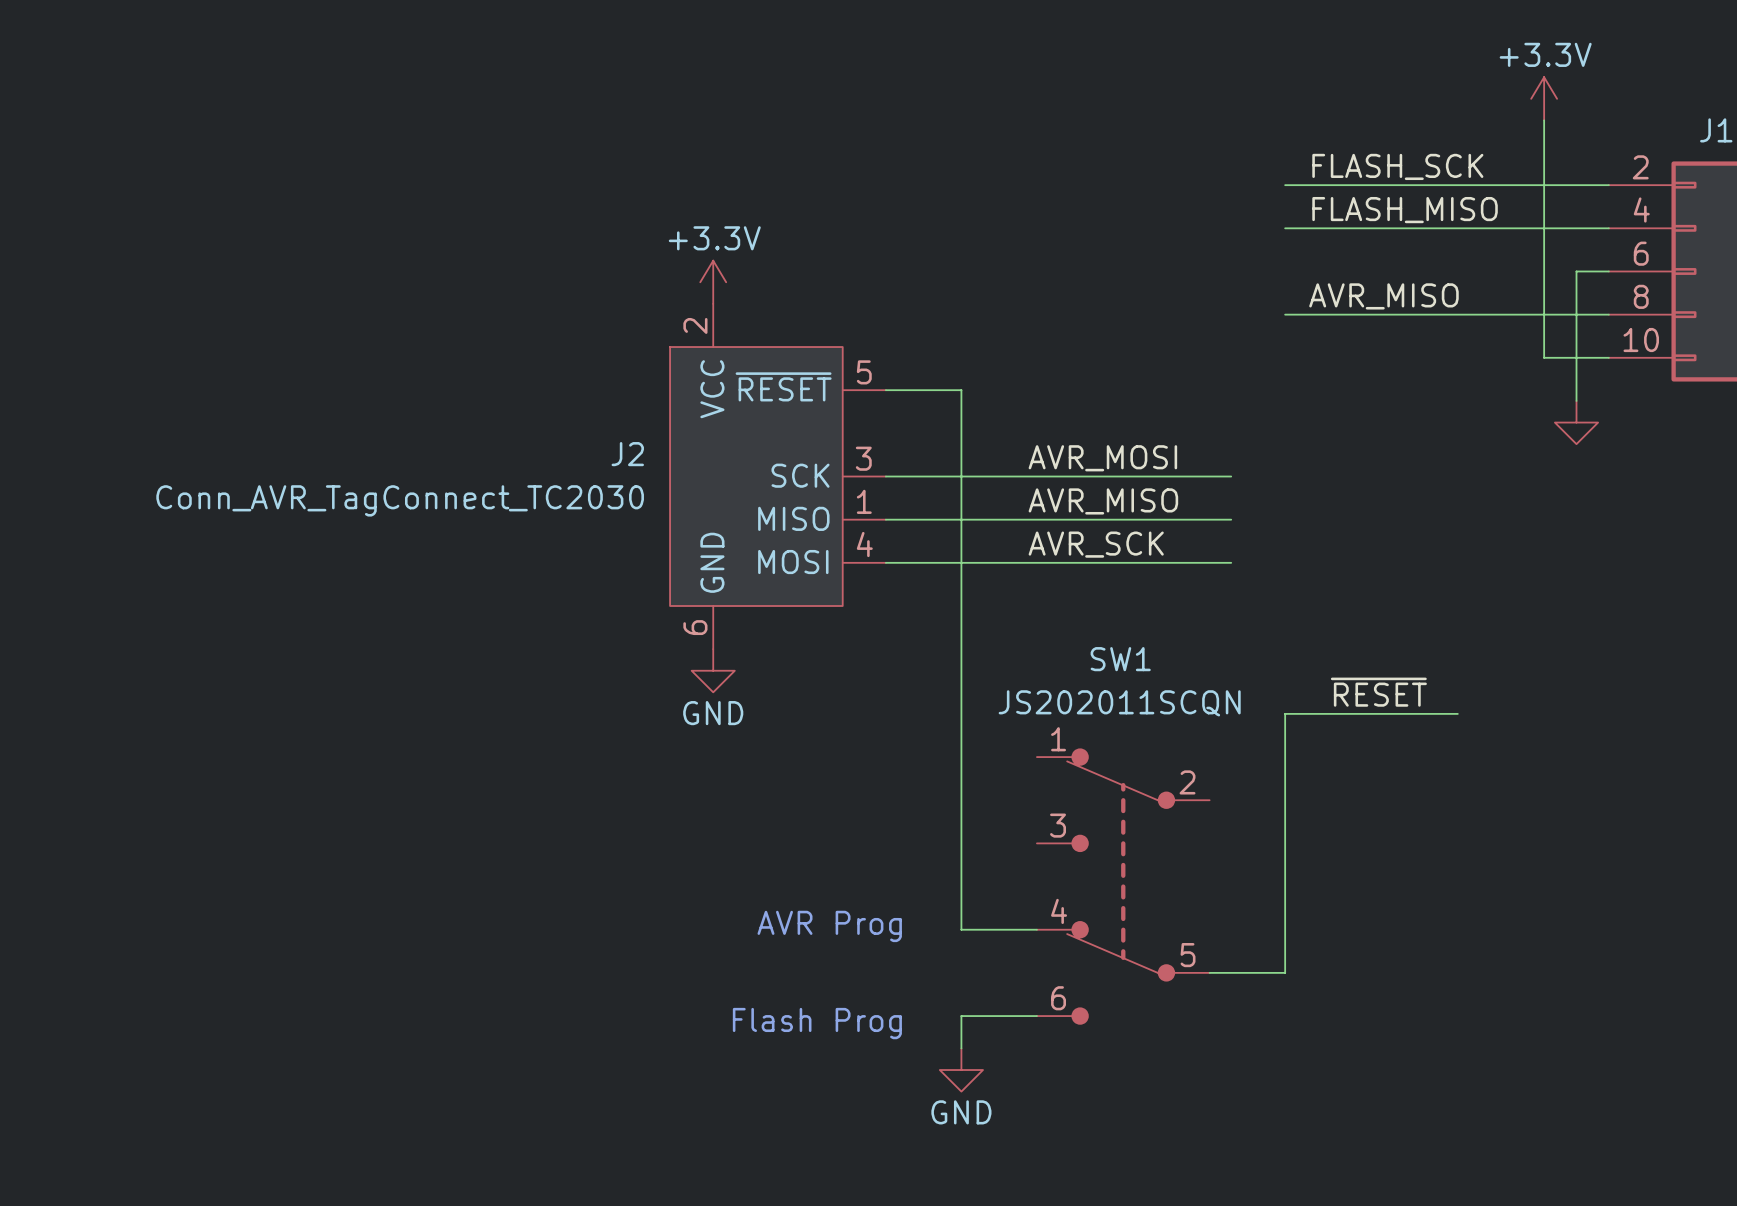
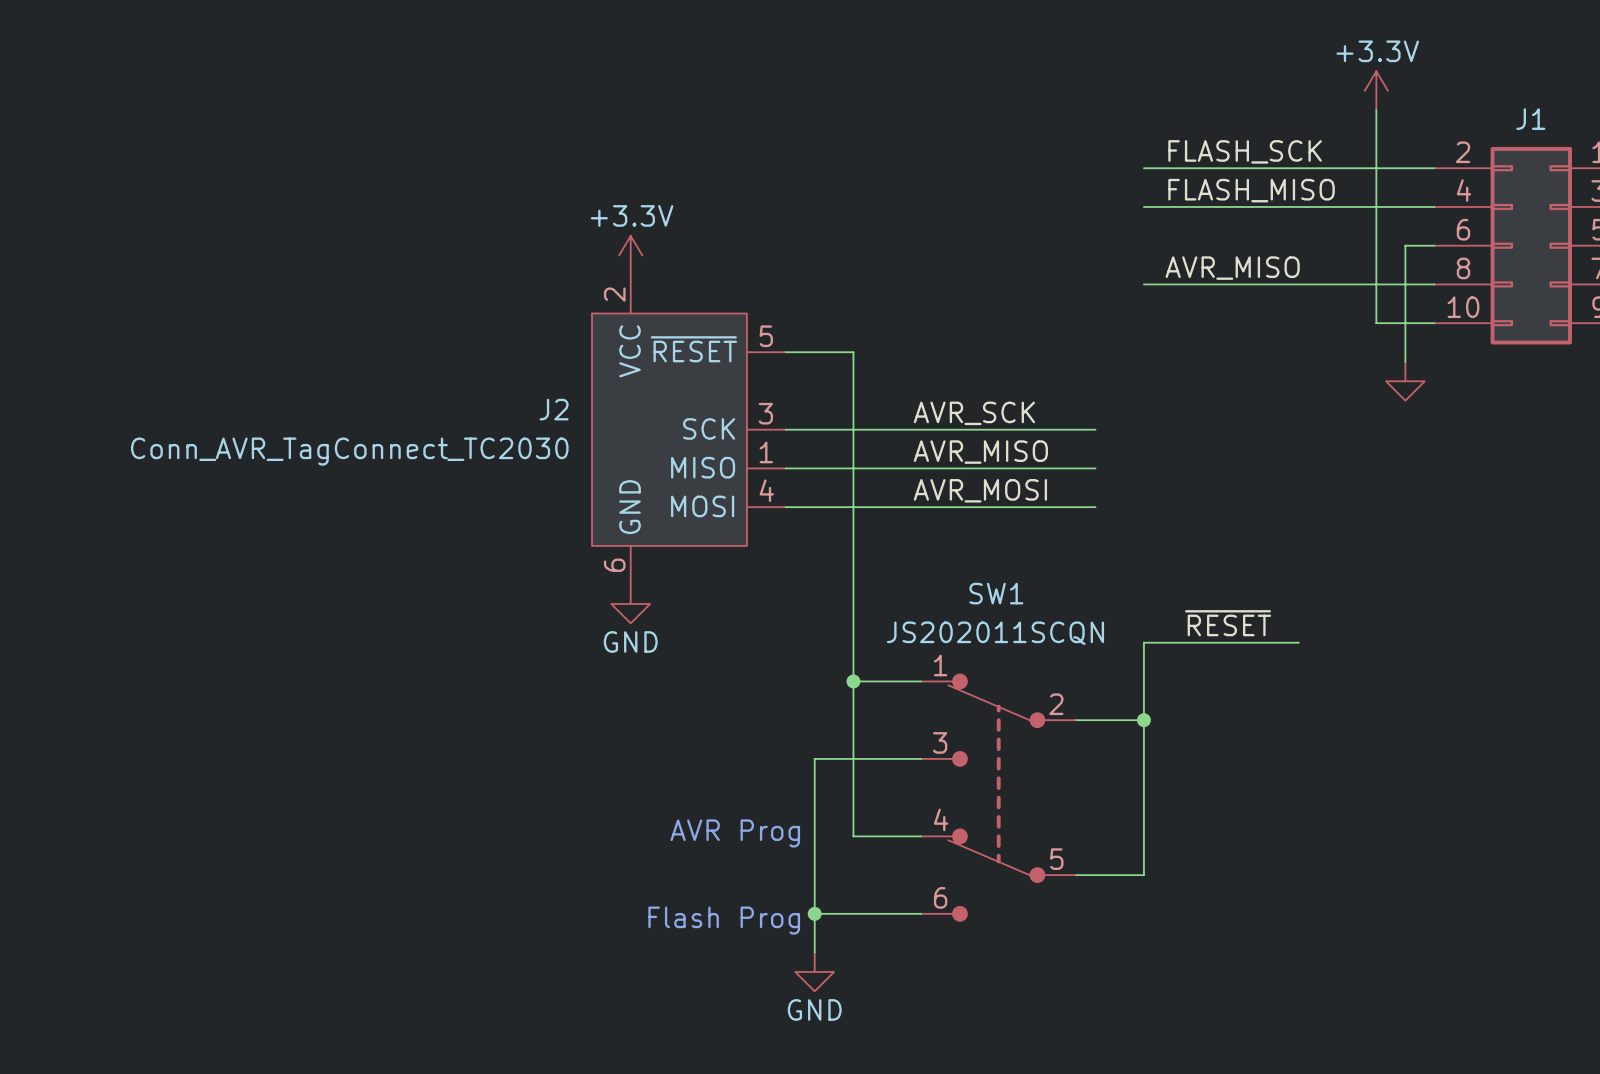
label: AVR_MOSI (1102, 458) -> AVR_SCK (974, 413)
label: AVR_SCK (1096, 544) -> AVR_MOSI (980, 490)
wire: none -> (853, 681) (921, 681)
junction: none -> (853, 681)
wire: none -> (1076, 720) (1143, 720)
junction: none -> (1143, 720)
wire: none -> (921, 758) (814, 758) (814, 952)
junction: none -> (814, 913)
wire: (961, 1016) (961, 1048) -> (853, 913) (814, 913)
power symbol position: GND (961, 1070) -> GND (814, 971)

